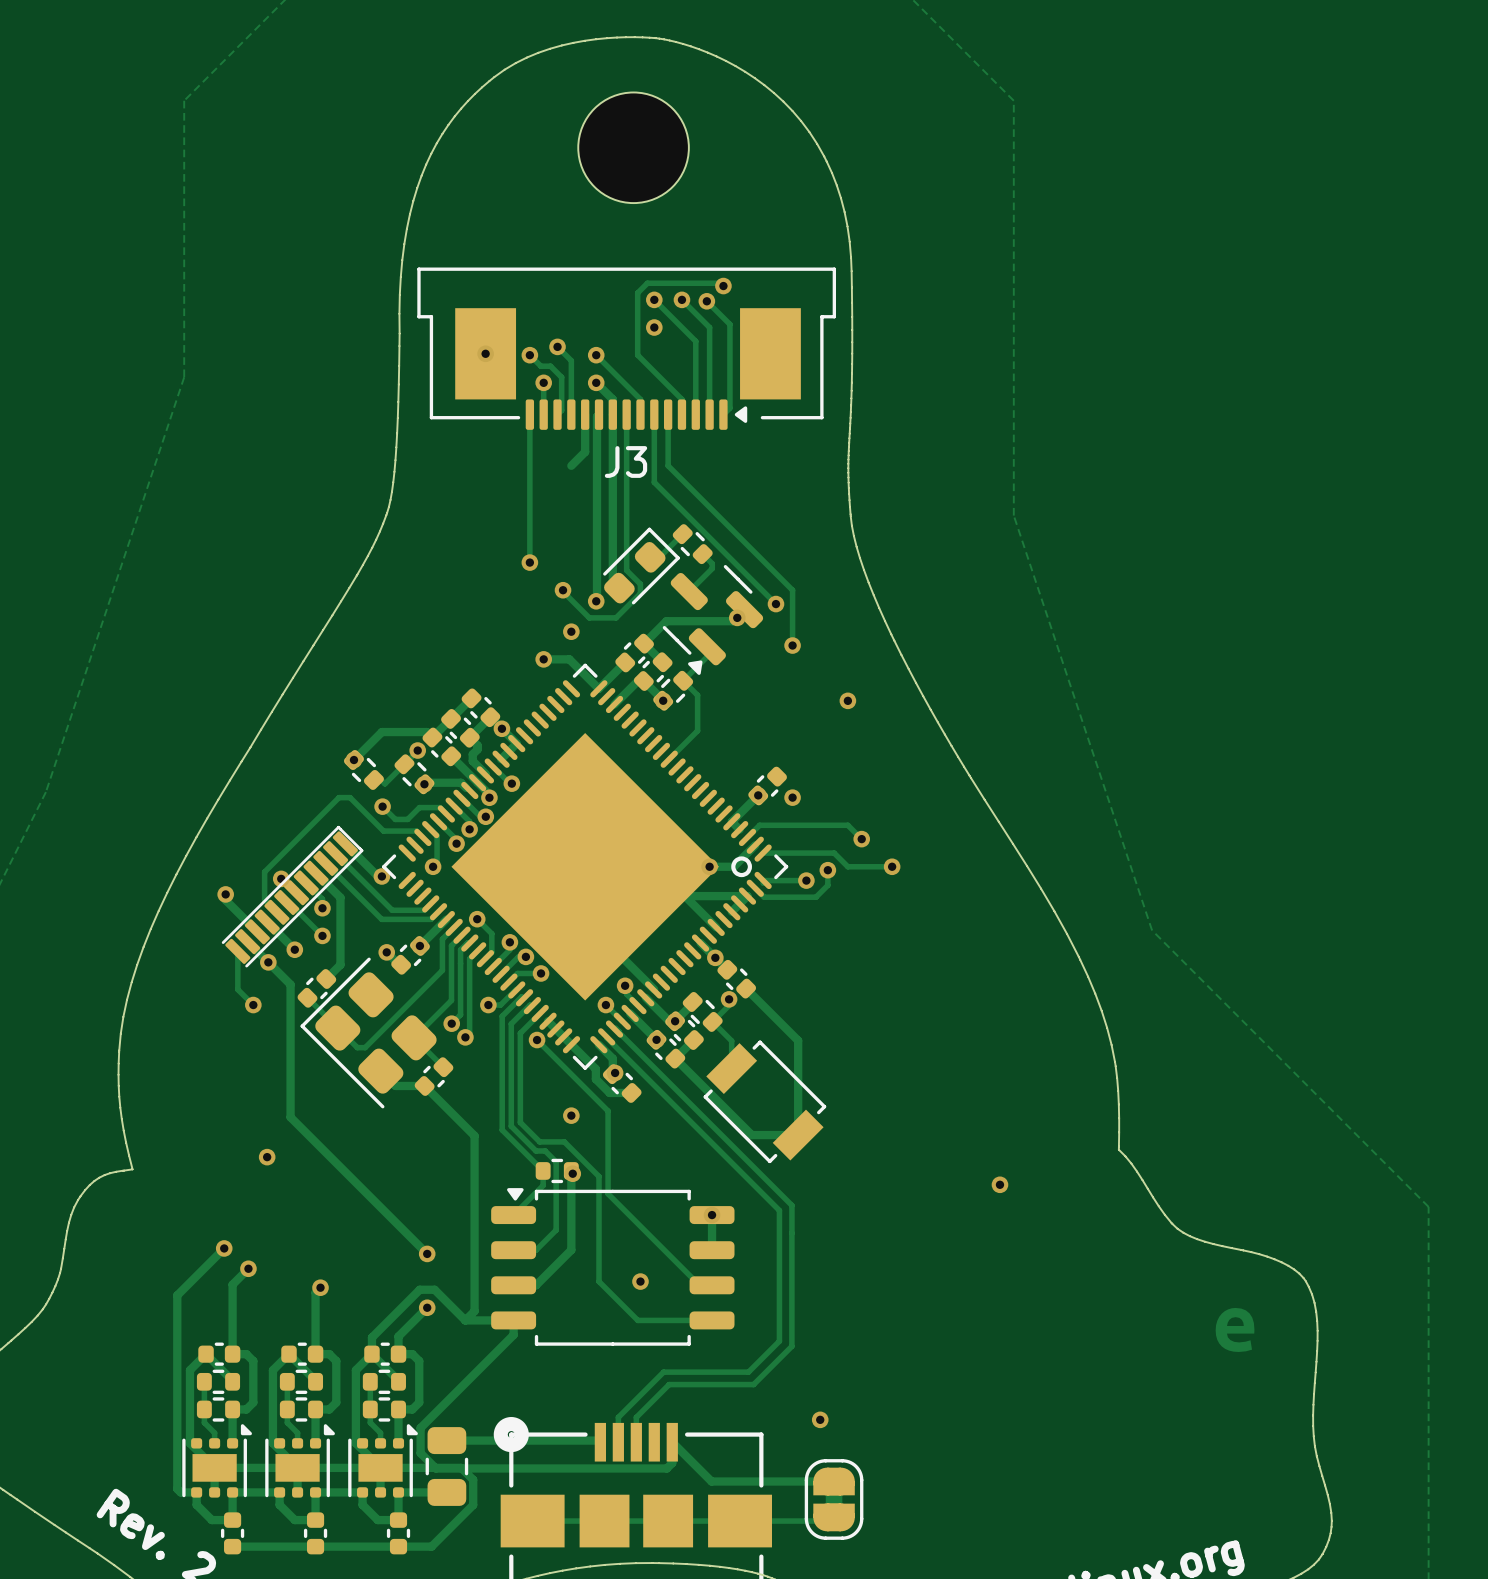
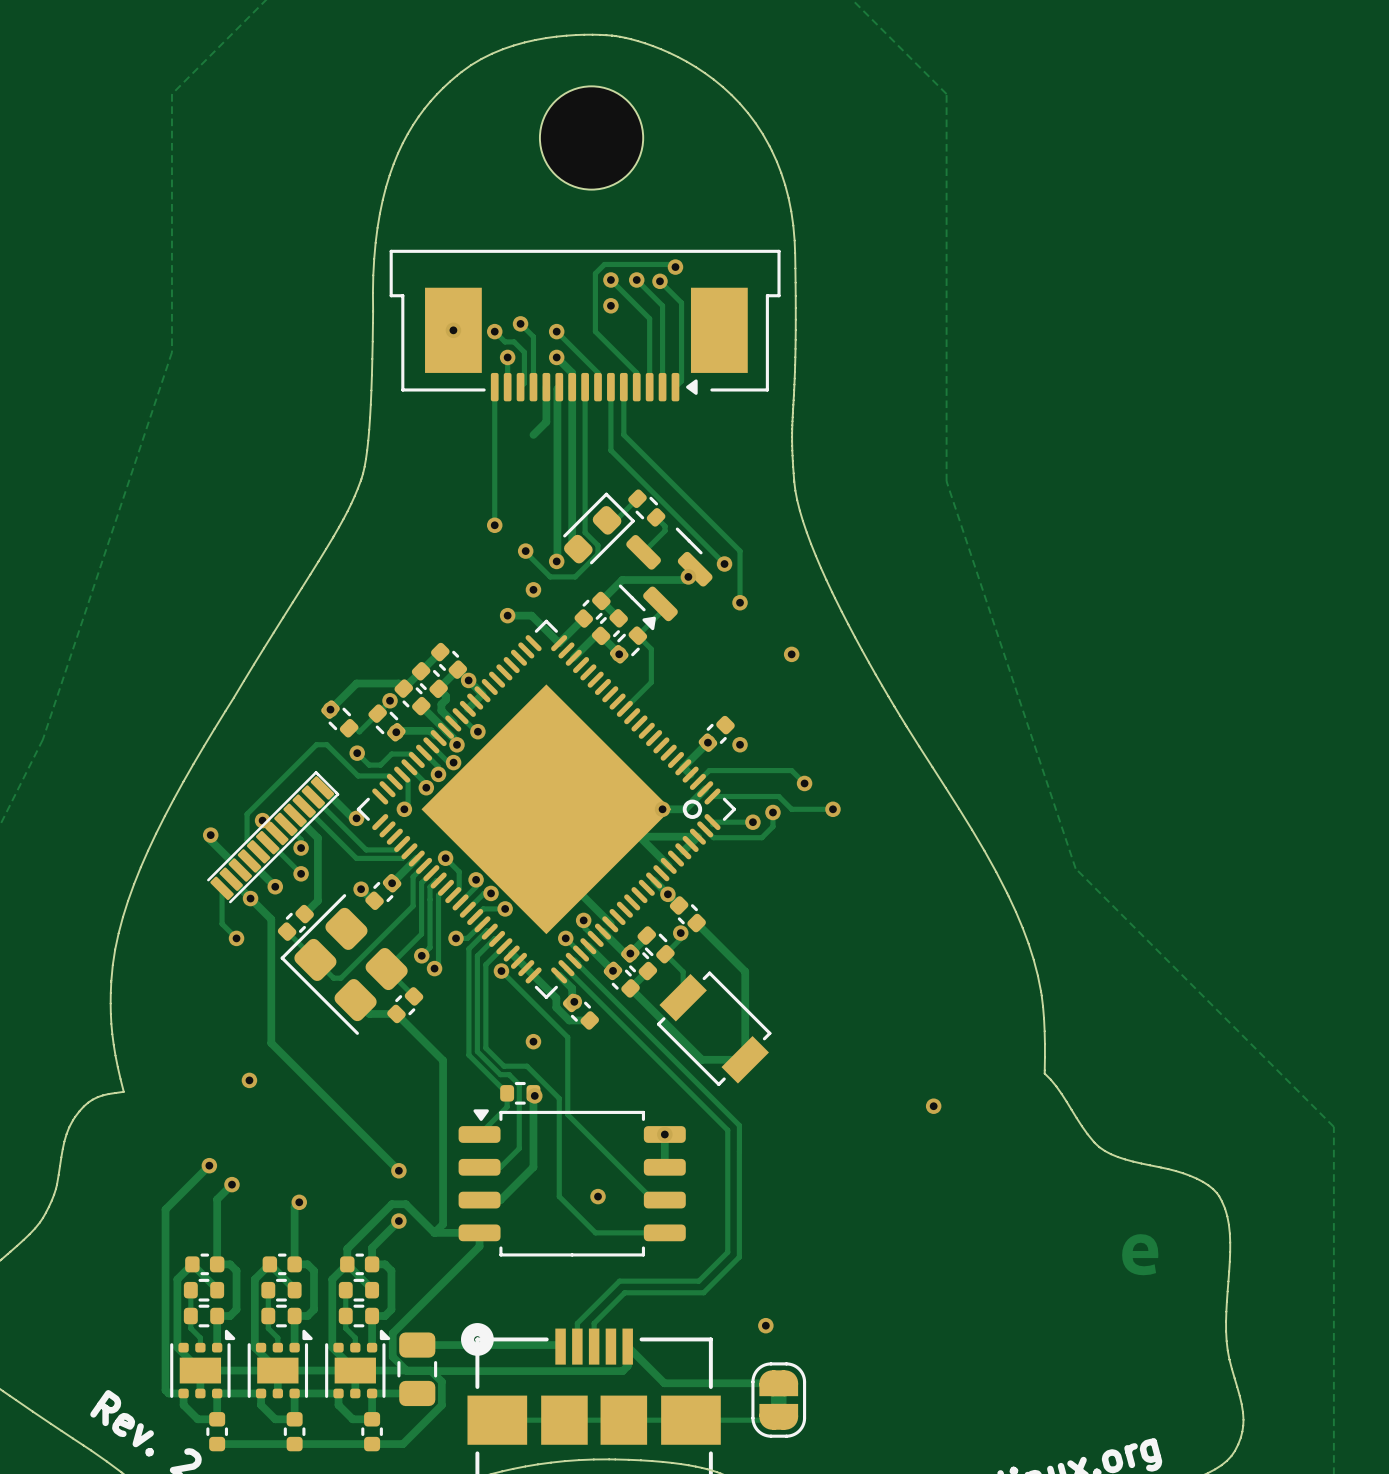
J3 name: J3 (626, 461) -> none
drawing position: (1235, 1329) -> (1140, 1254)

